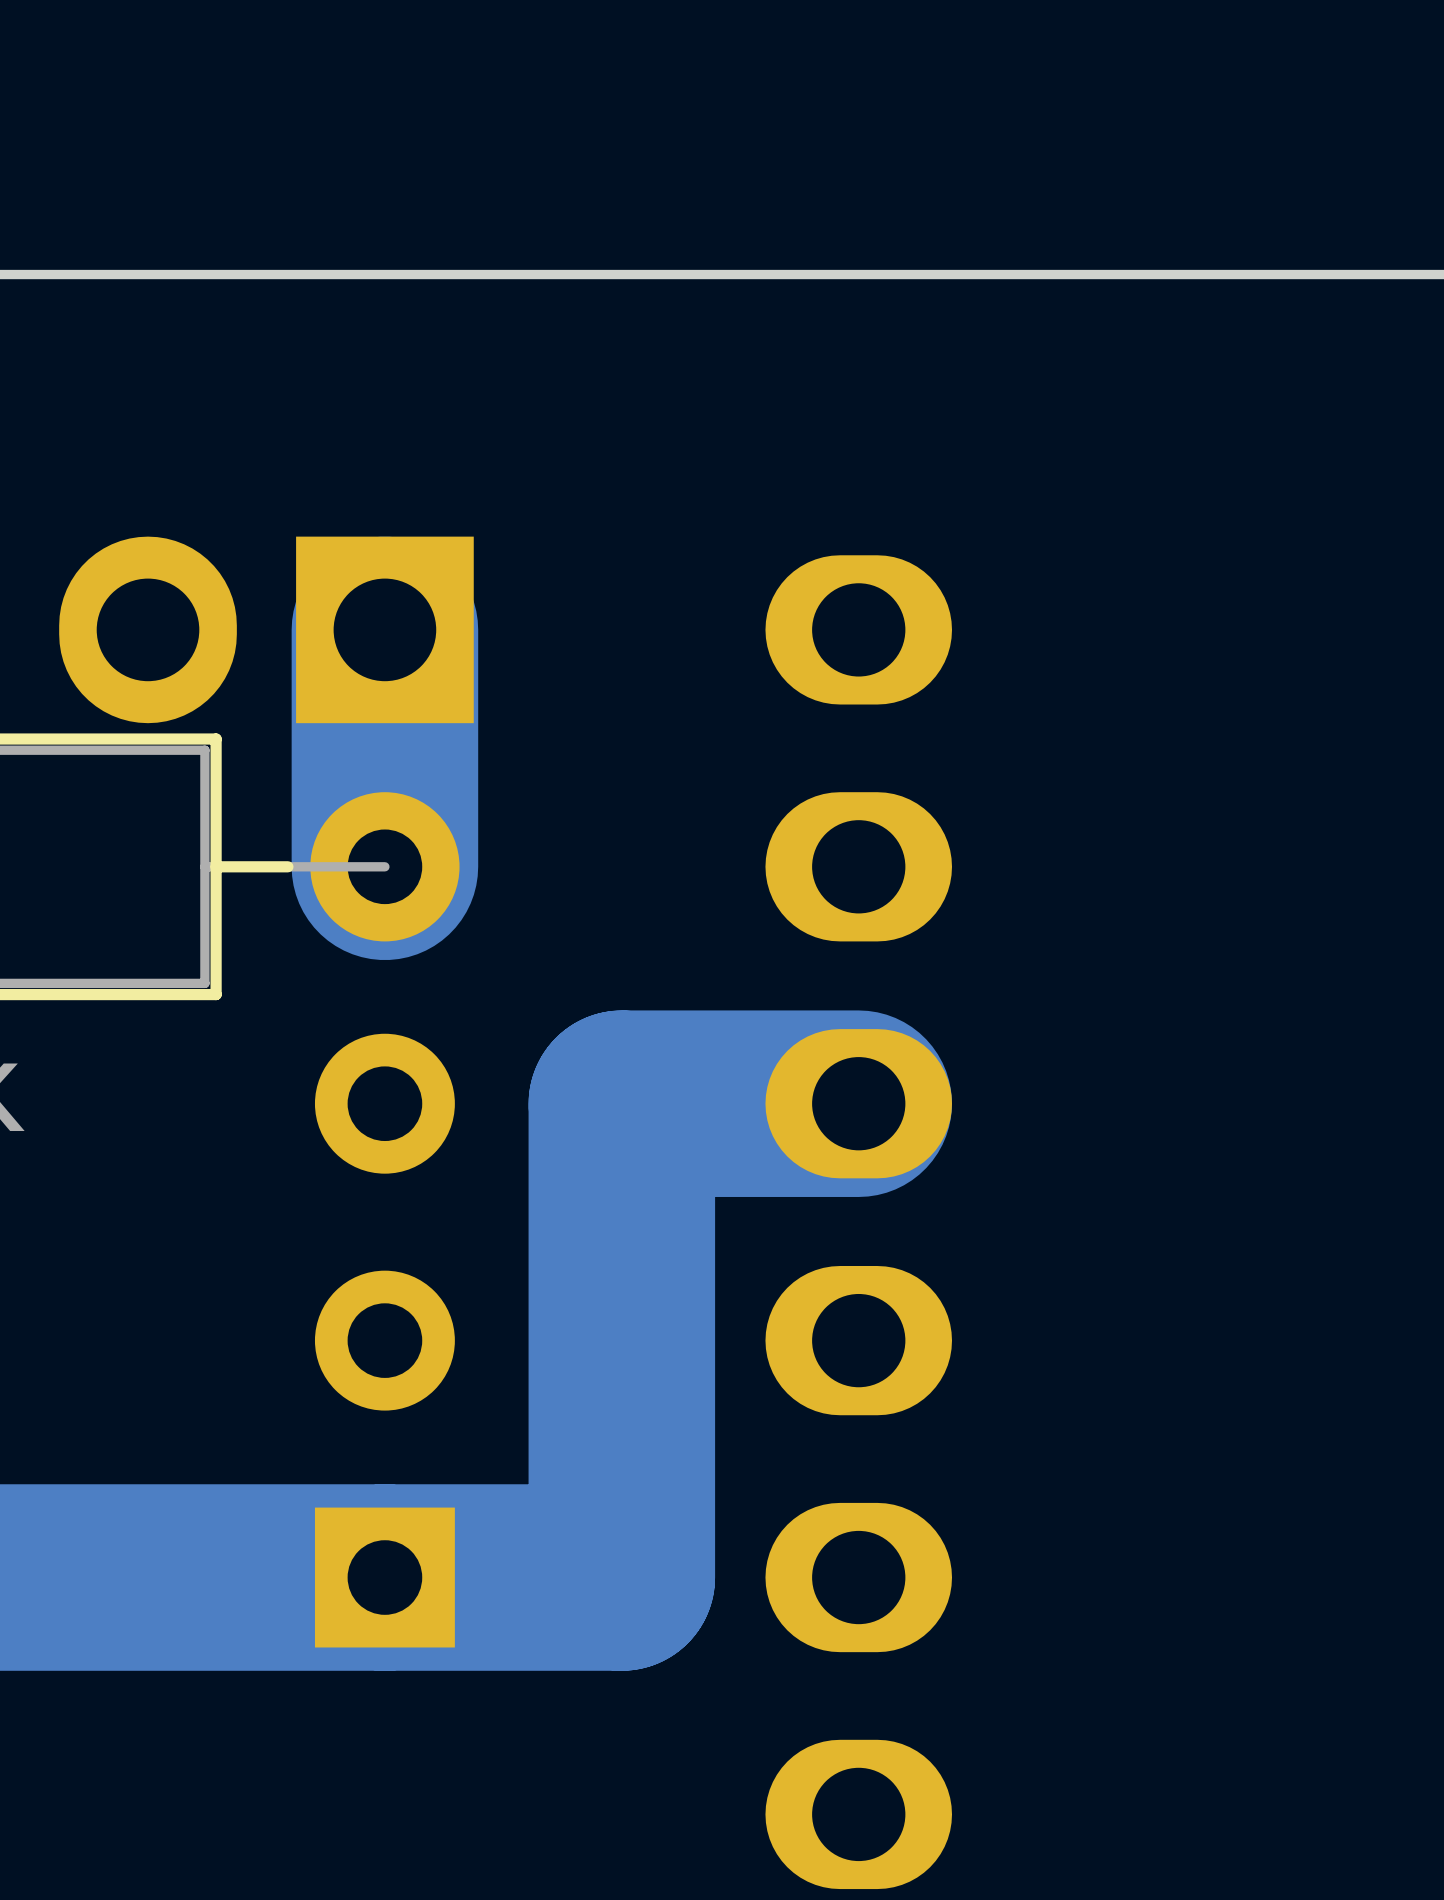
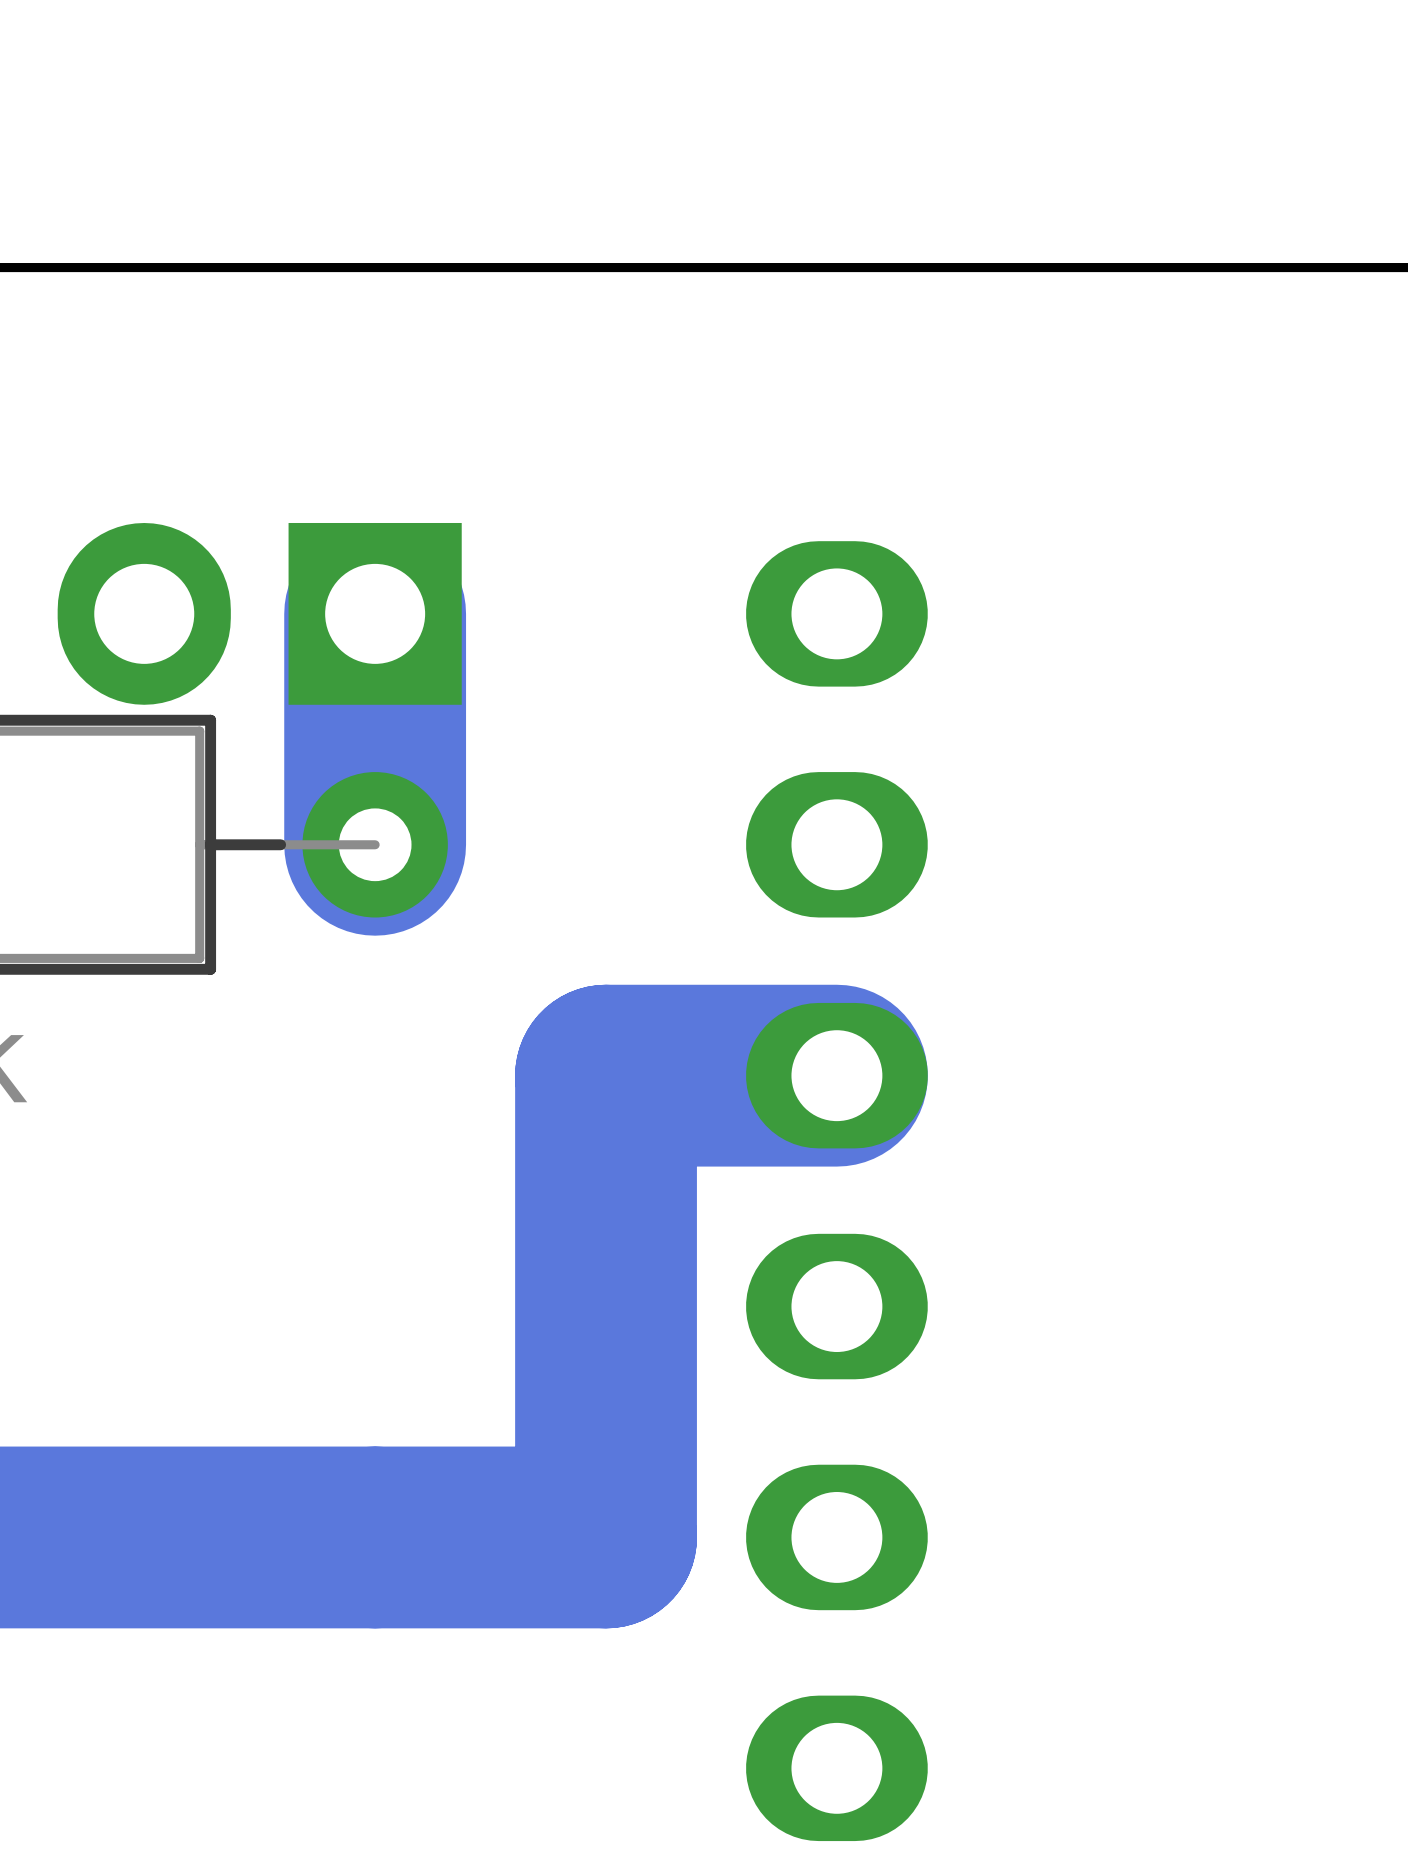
part: (384, 1340) -> none

